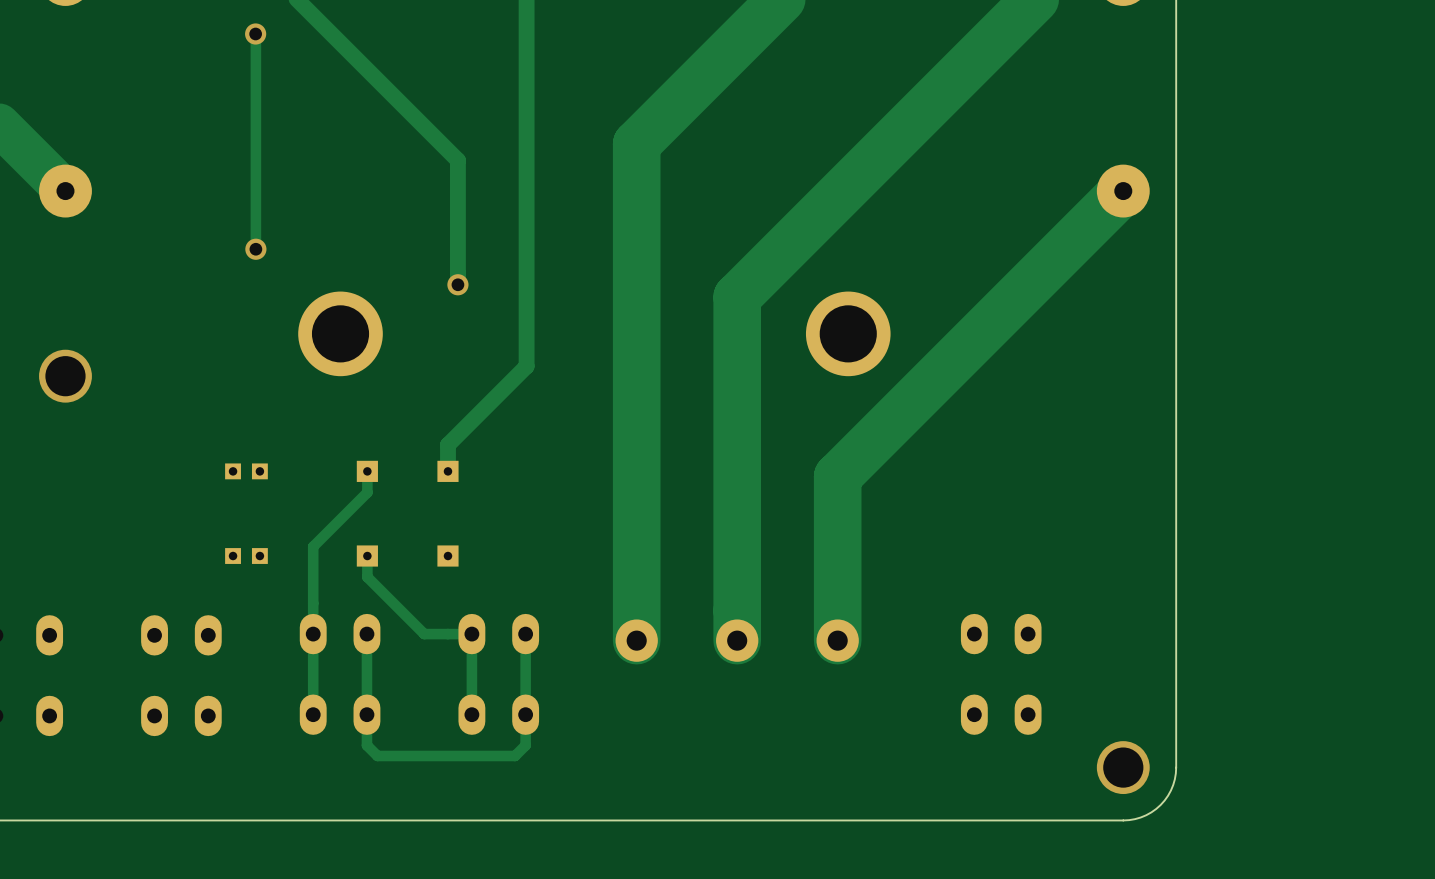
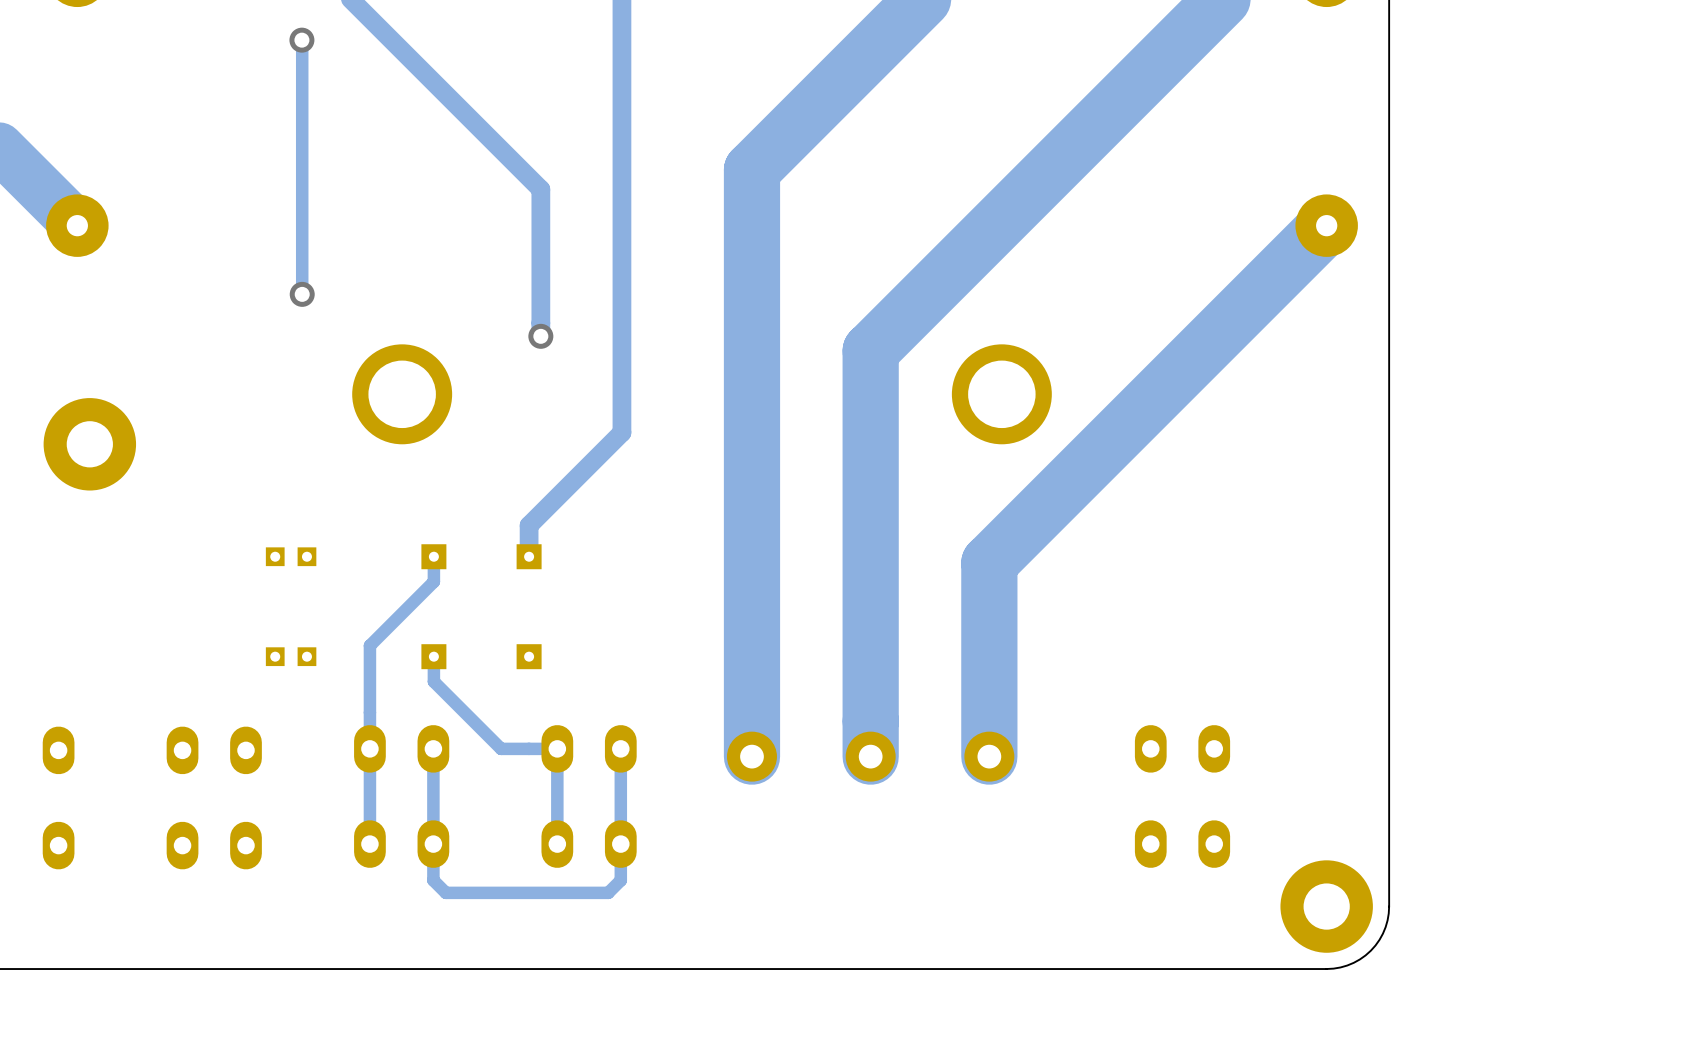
via: (65, 376) -> none
part: none -> (89, 444)
via: (1123, 767) -> none
part: none -> (1326, 906)

